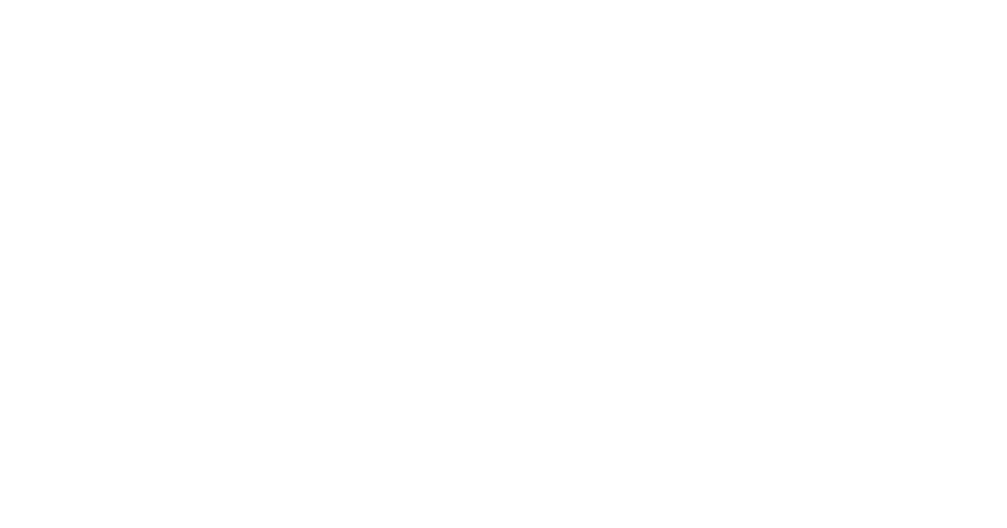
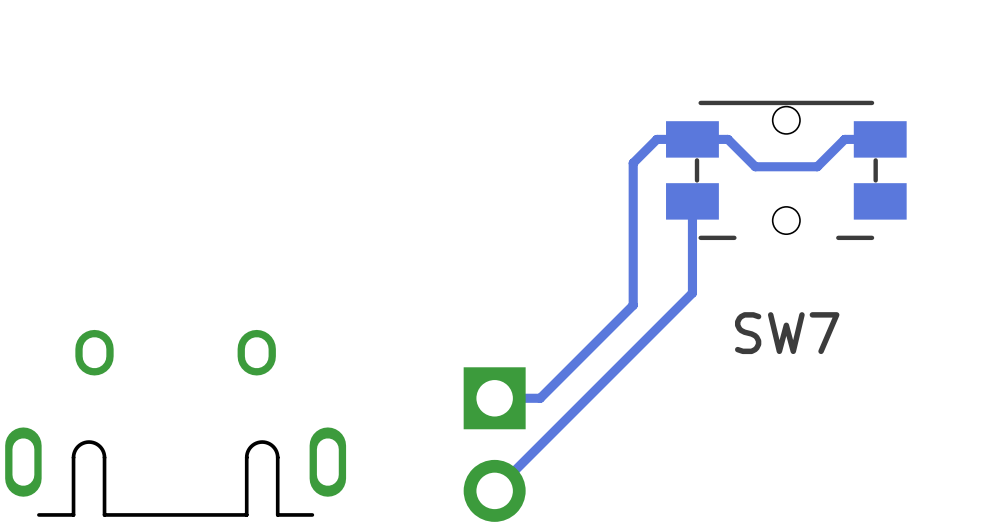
track: none -> (880, 139) (844, 139) (817, 166) (755, 166) (728, 139) (656, 139) (633, 163) (633, 305) (540, 398) (494, 398)
SW7: none -> (786, 170)
track: none -> (692, 201) (692, 293) (494, 490)
part: none -> (175, 423)
part: none -> (494, 444)

